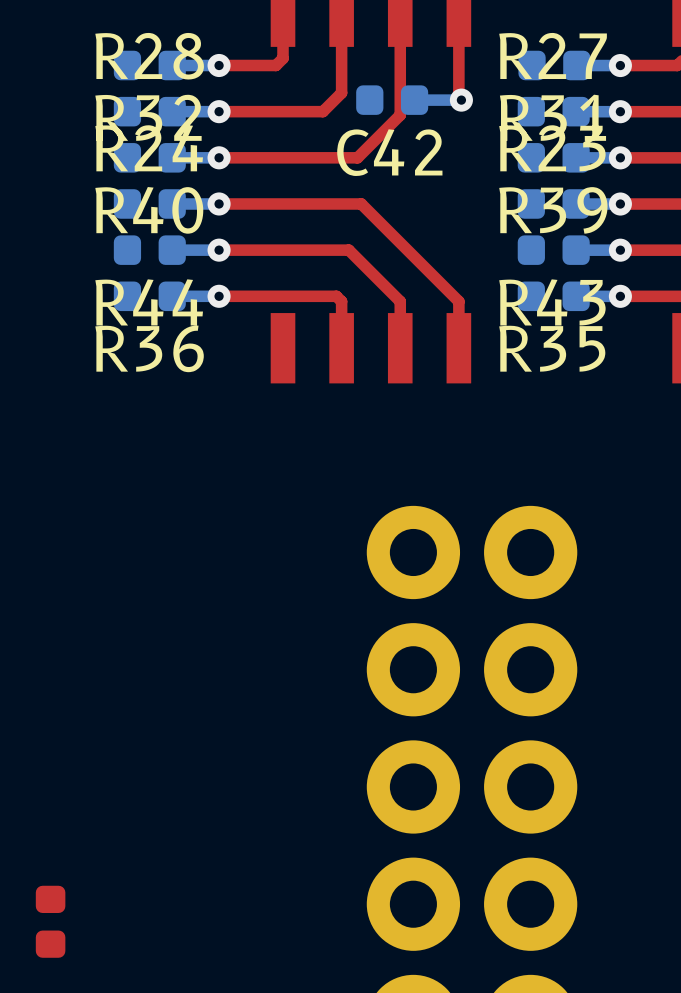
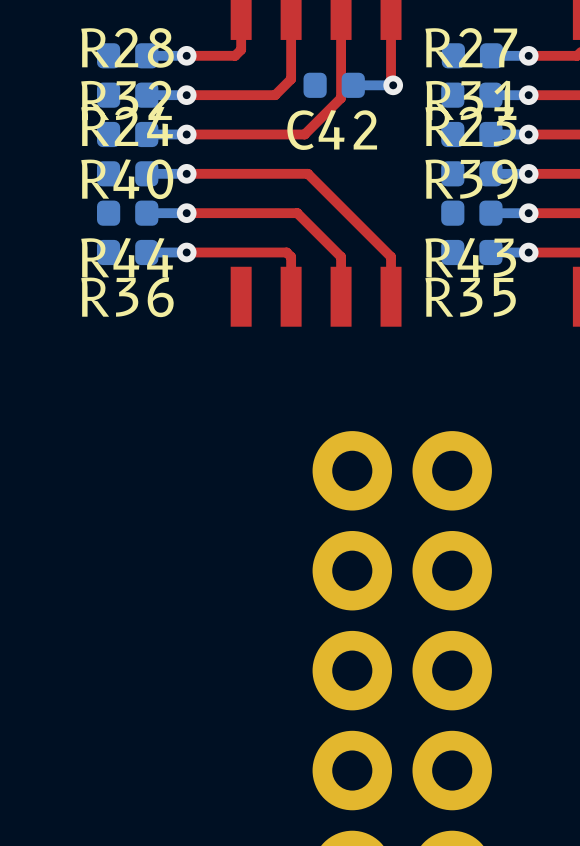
part: (50, 921) -> none

